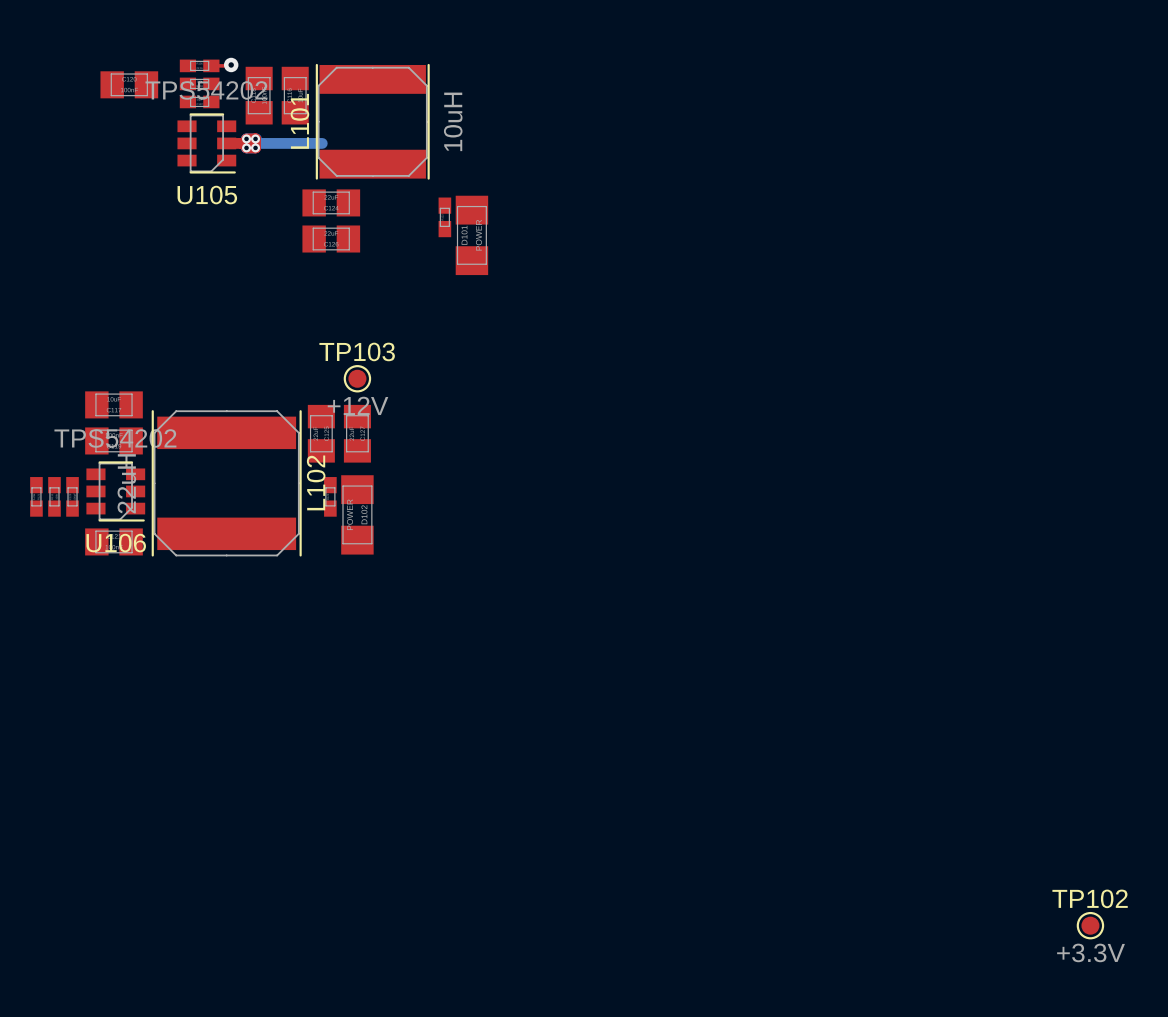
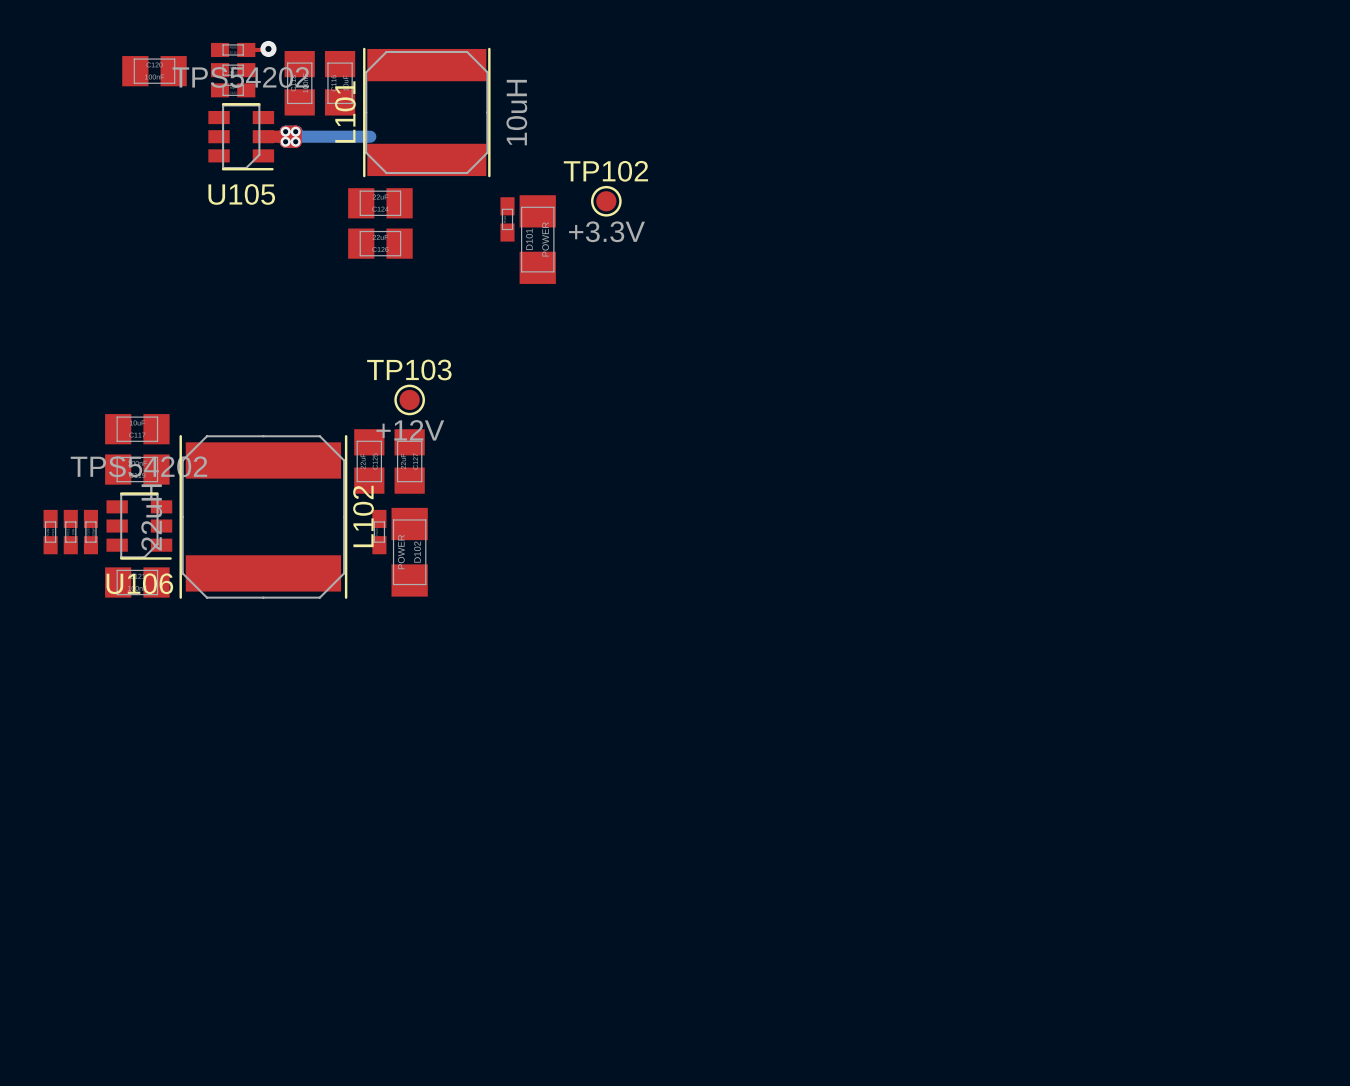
TP102 position: (1090, 925) -> (606, 201)

